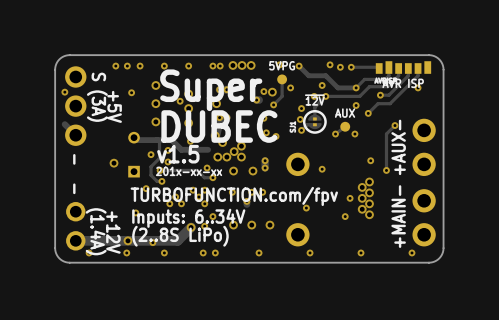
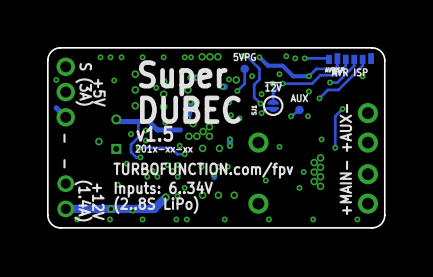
track: none -> (247, 57) (259, 68) (259, 79) (254, 84) (254, 97) (260, 103)

